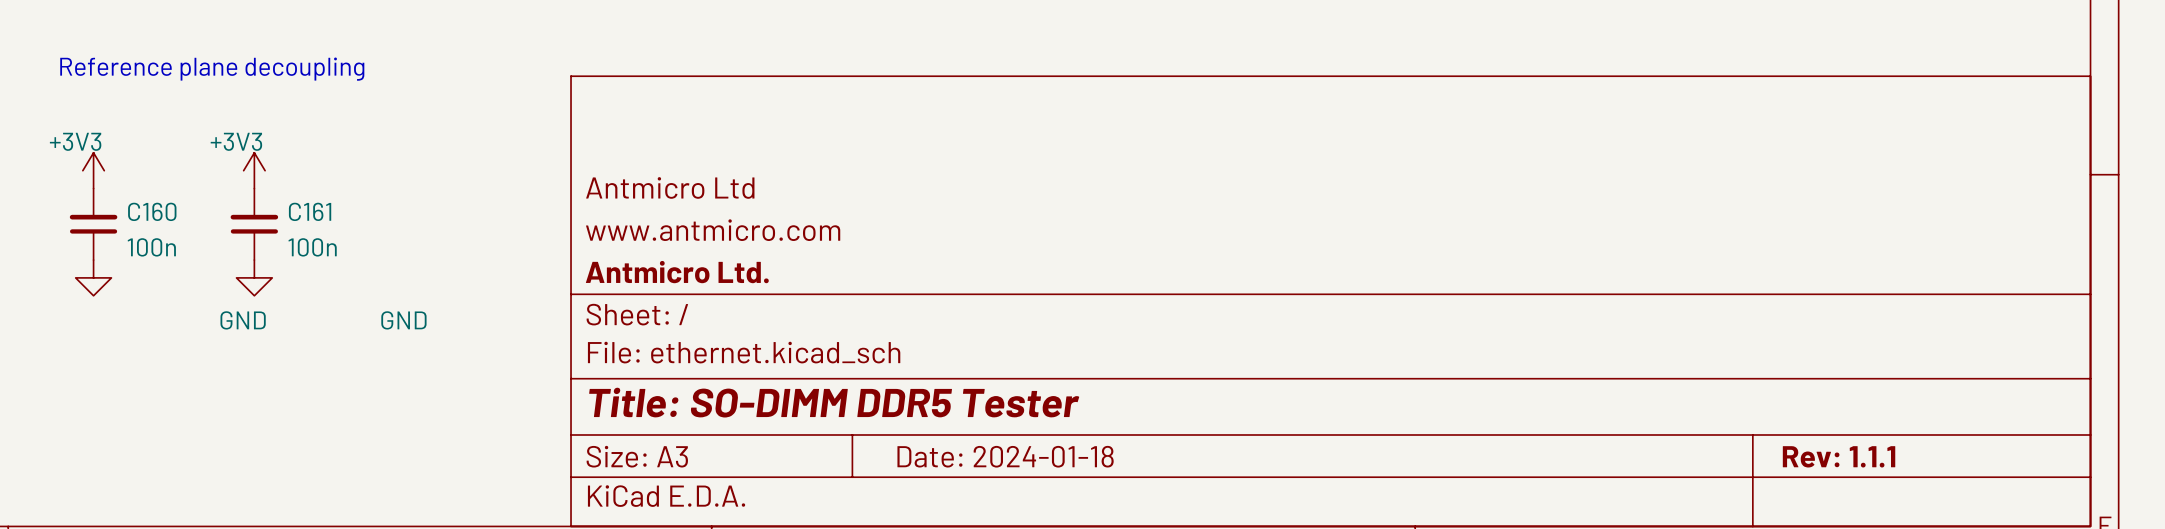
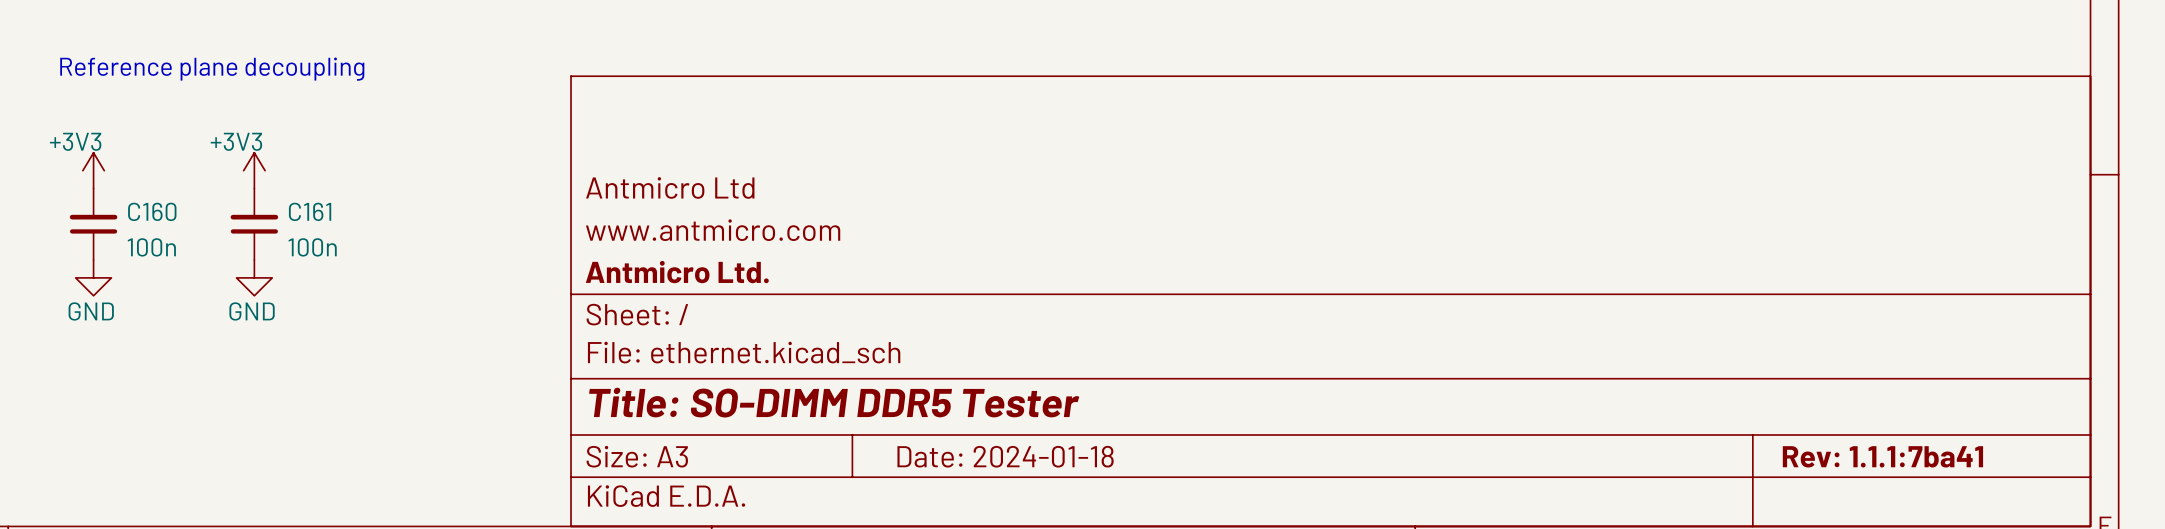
power symbol text position: GND (243, 320) -> GND (91, 311)
power symbol text position: GND (403, 320) -> GND (252, 311)
title block: Rev: 1.1.1 (1839, 456) -> Rev: 1.1.1:7ba41 (1882, 456)

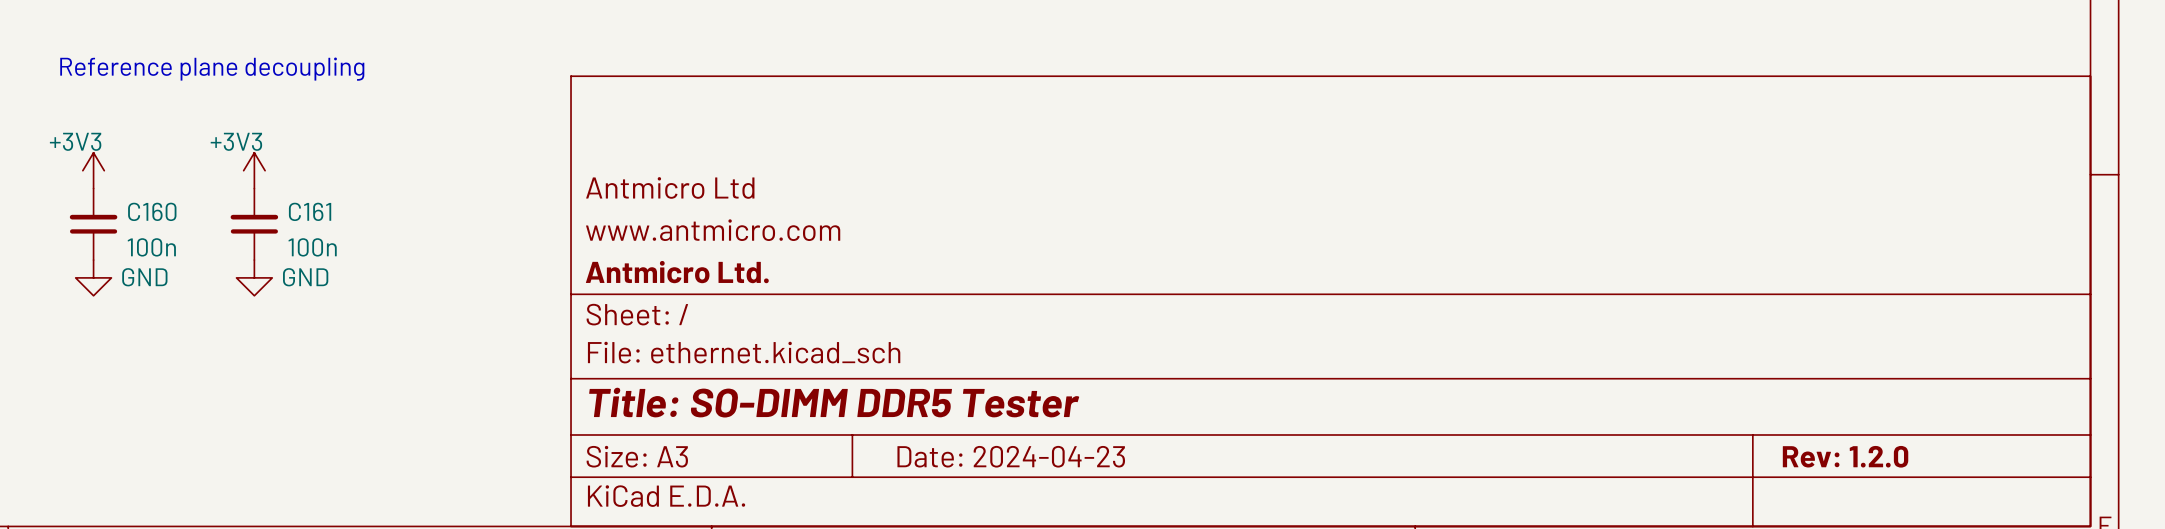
power symbol text position: GND (91, 311) -> GND (144, 277)
power symbol text position: GND (252, 311) -> GND (305, 277)
title block: Date: 2024-01-18 (1005, 456) -> Date: 2024-04-23 (1011, 456)
title block: Rev: 1.1.1:7ba41 (1882, 456) -> Rev: 1.2.0 (1845, 456)

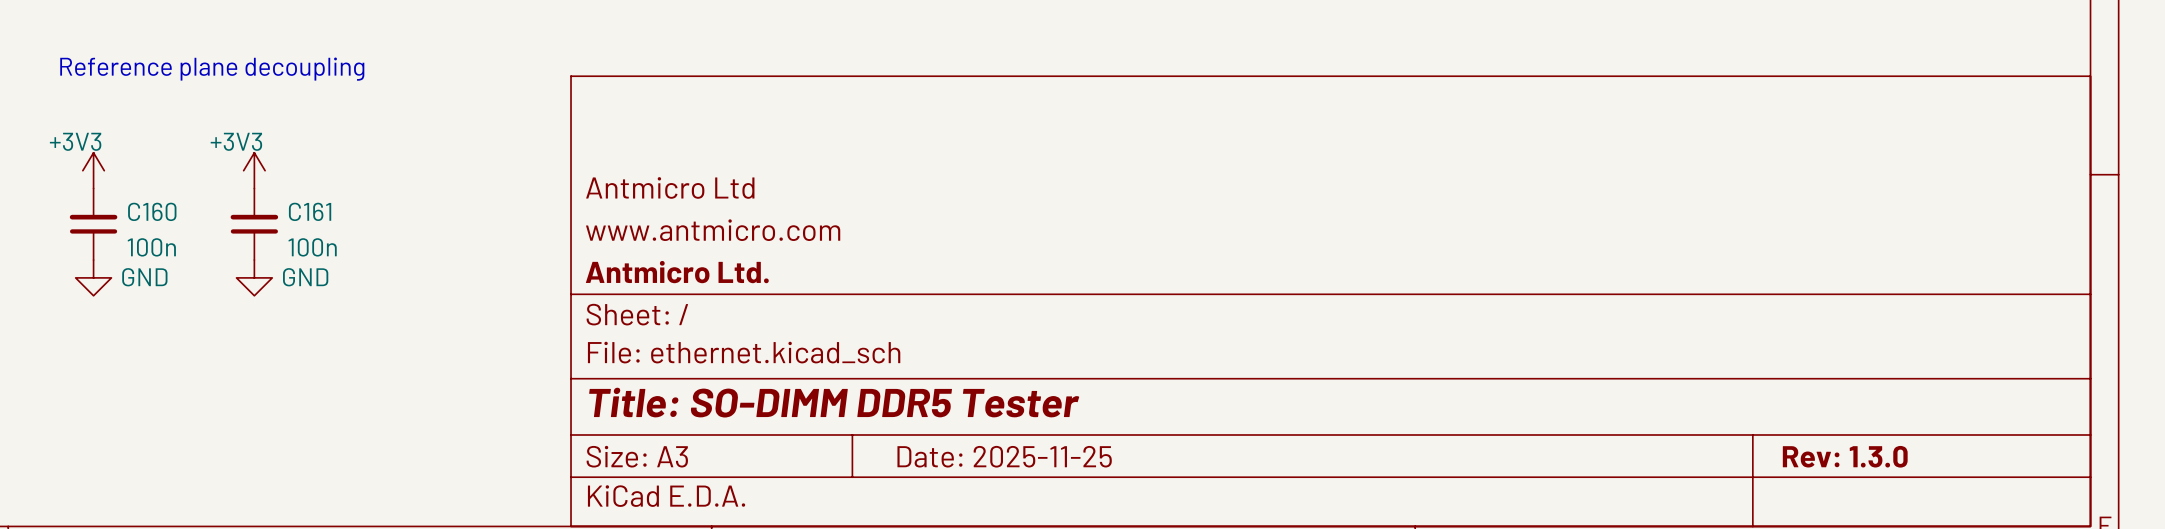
title block: Date: 2024-04-23 (1011, 456) -> Date: 2025-11-25 (1004, 456)
title block: Rev: 1.2.0 (1845, 456) -> Rev: 1.3.0 (1845, 456)

